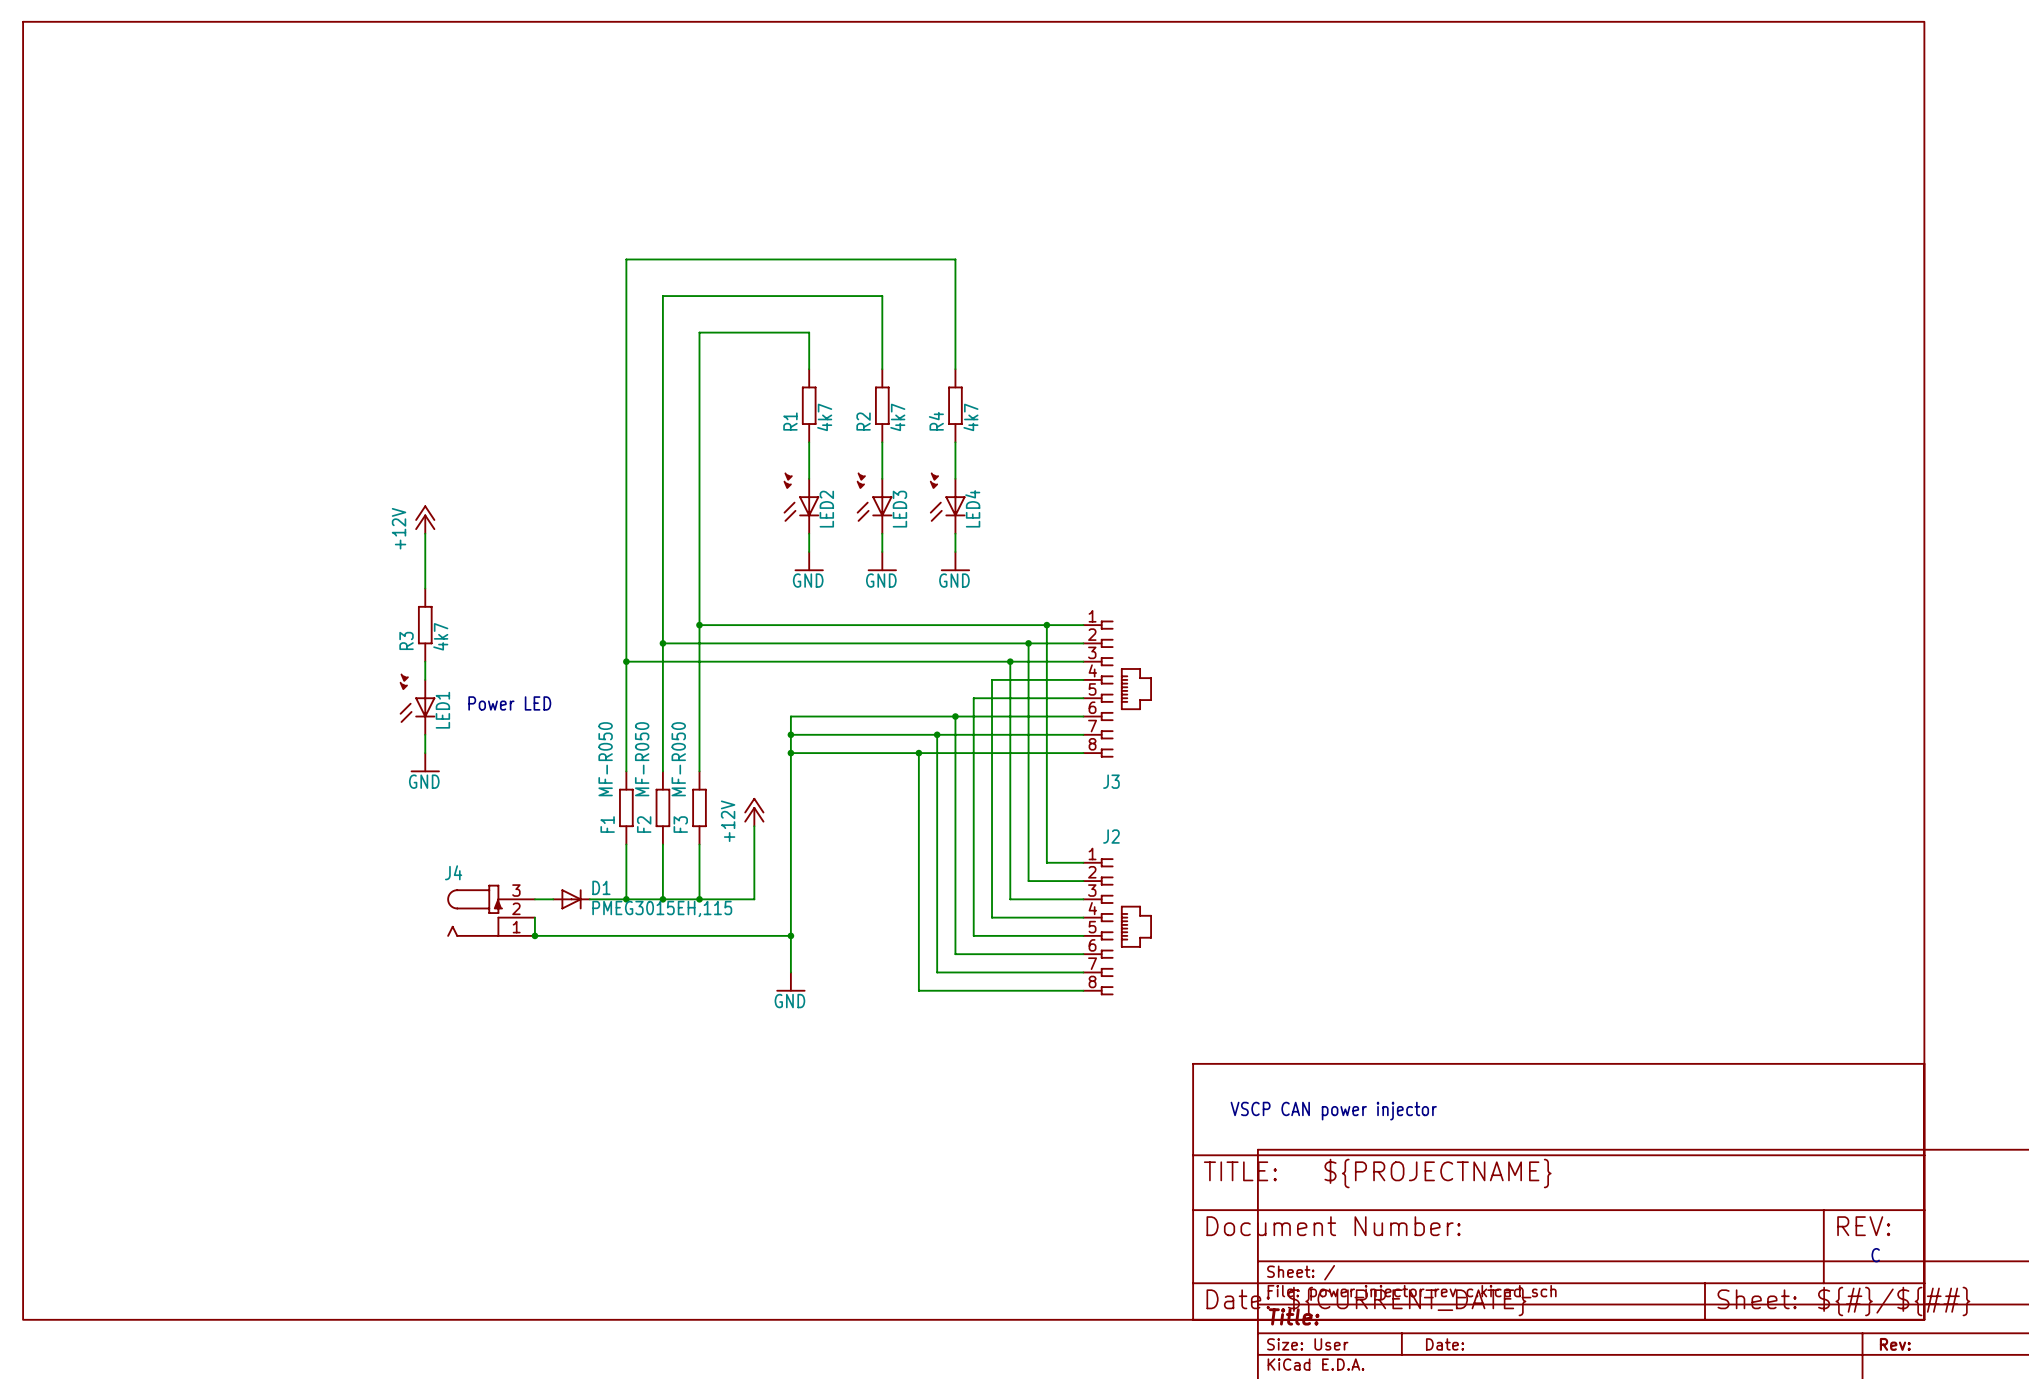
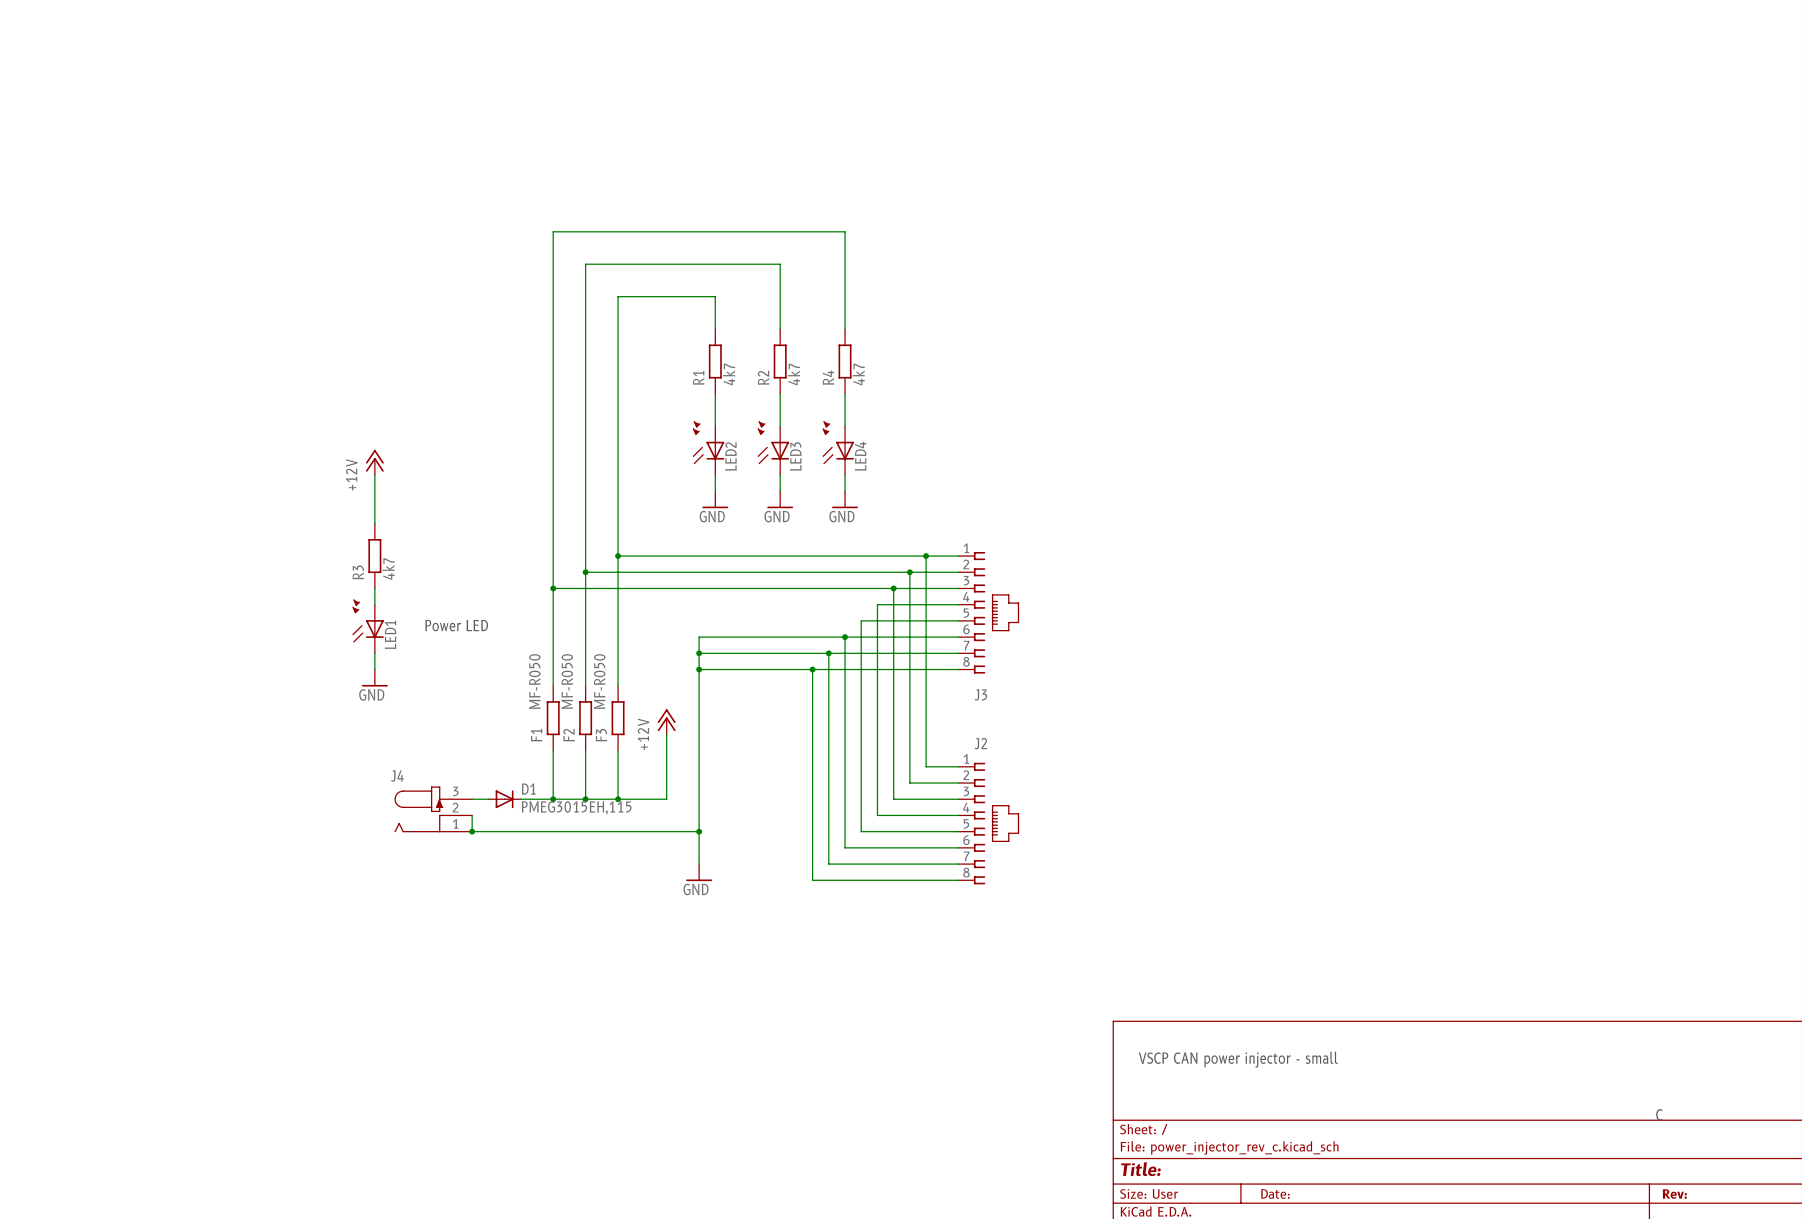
power symbol: (973, 670) -> none
text: VSCP CAN power injector (1333, 1111) -> none
power symbol: (1558, 1191) -> none
text: none -> VSCP CAN power injector - small (1238, 1059)

